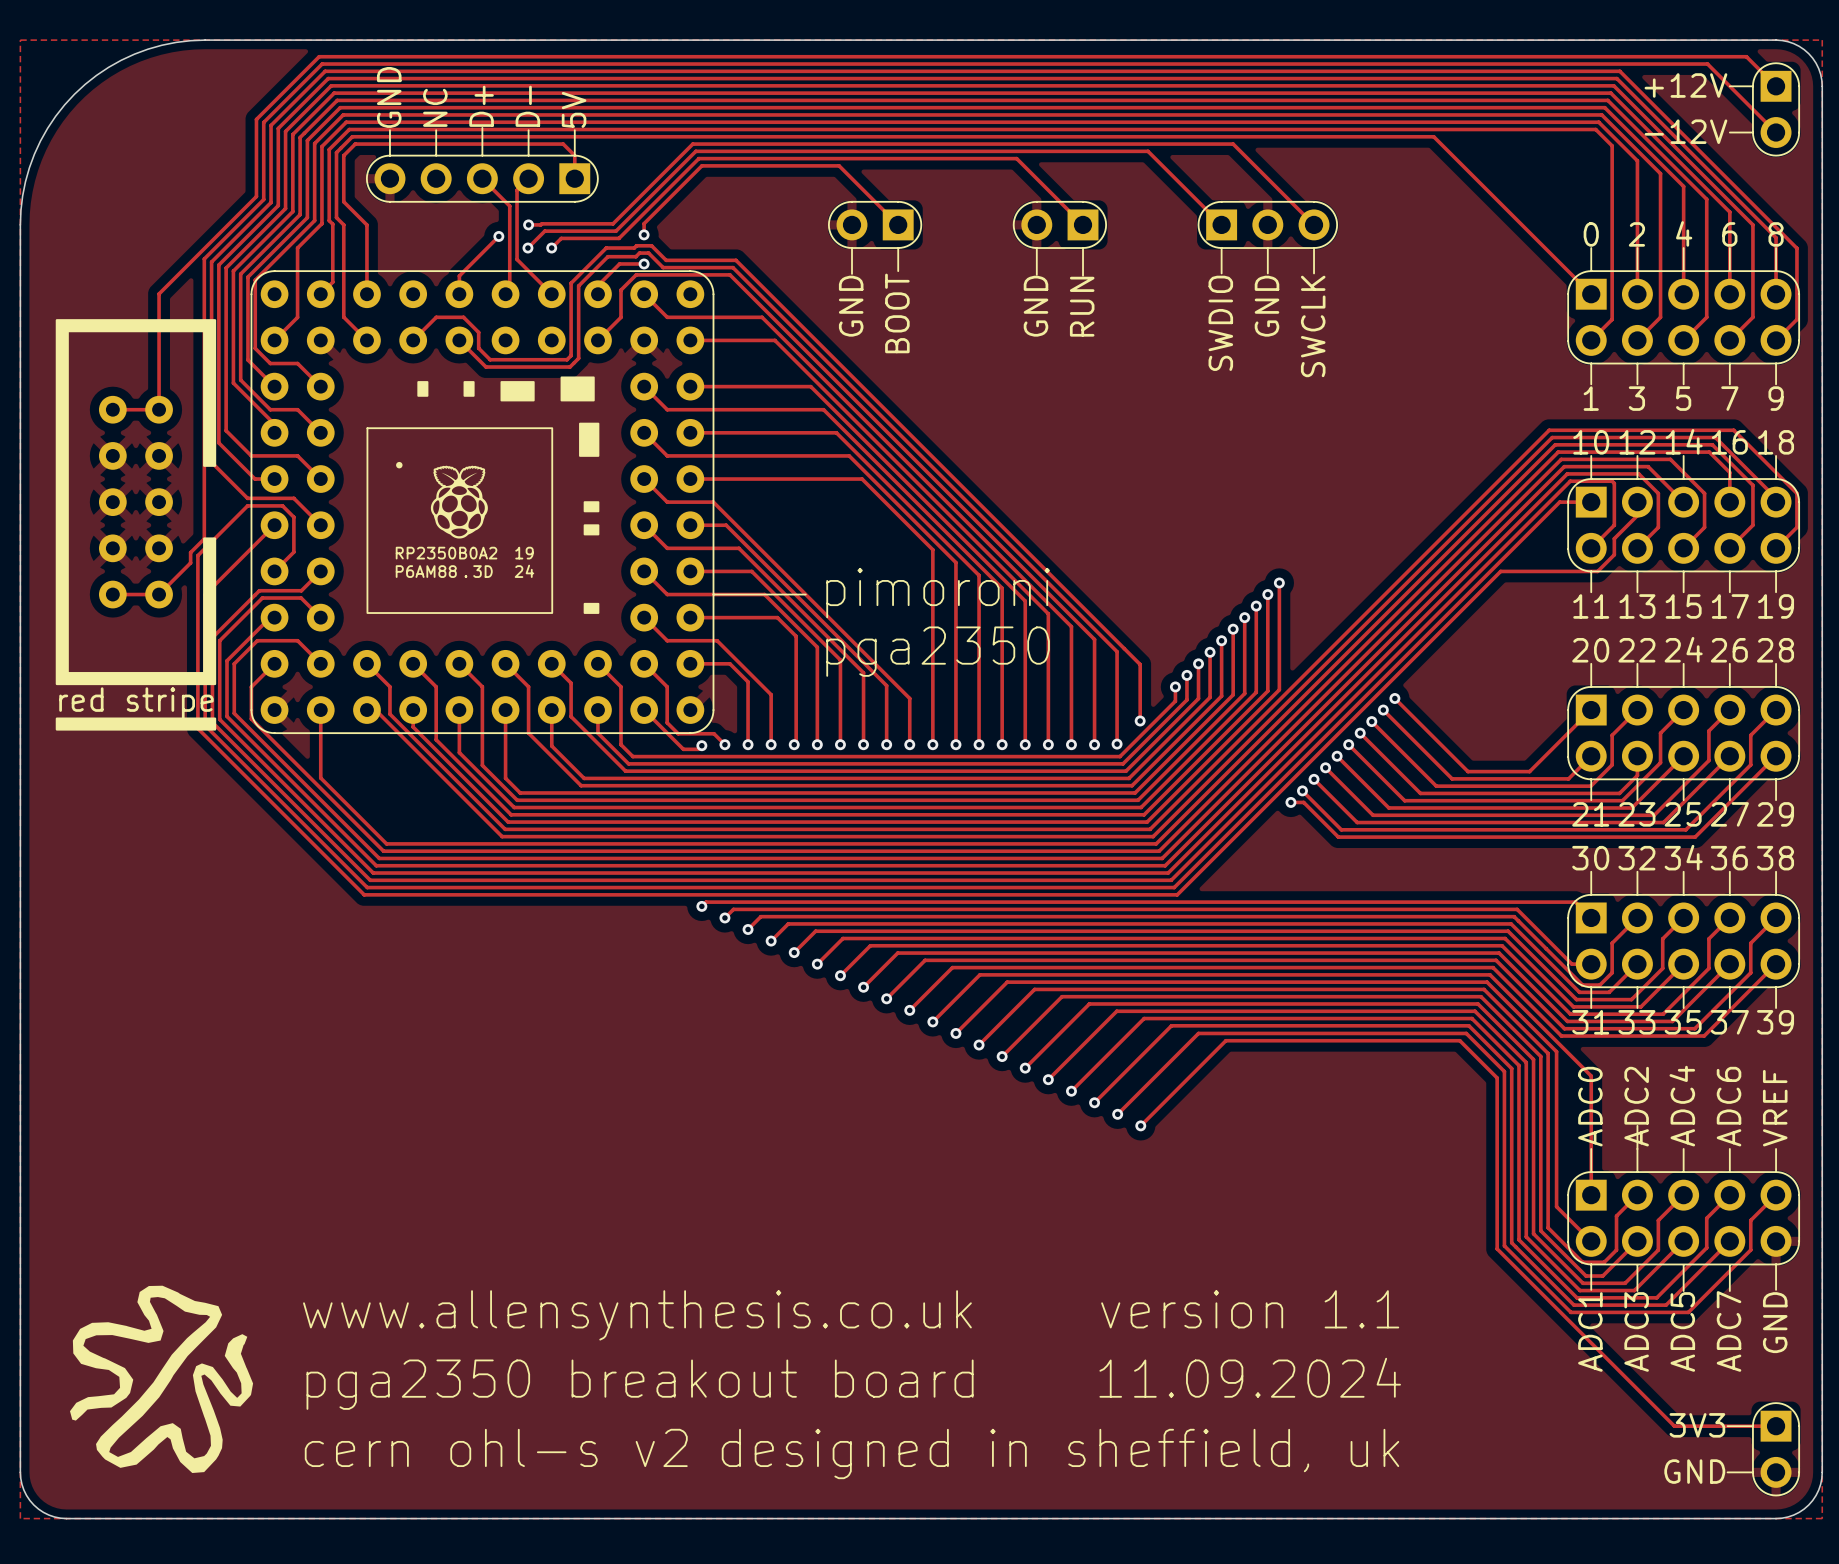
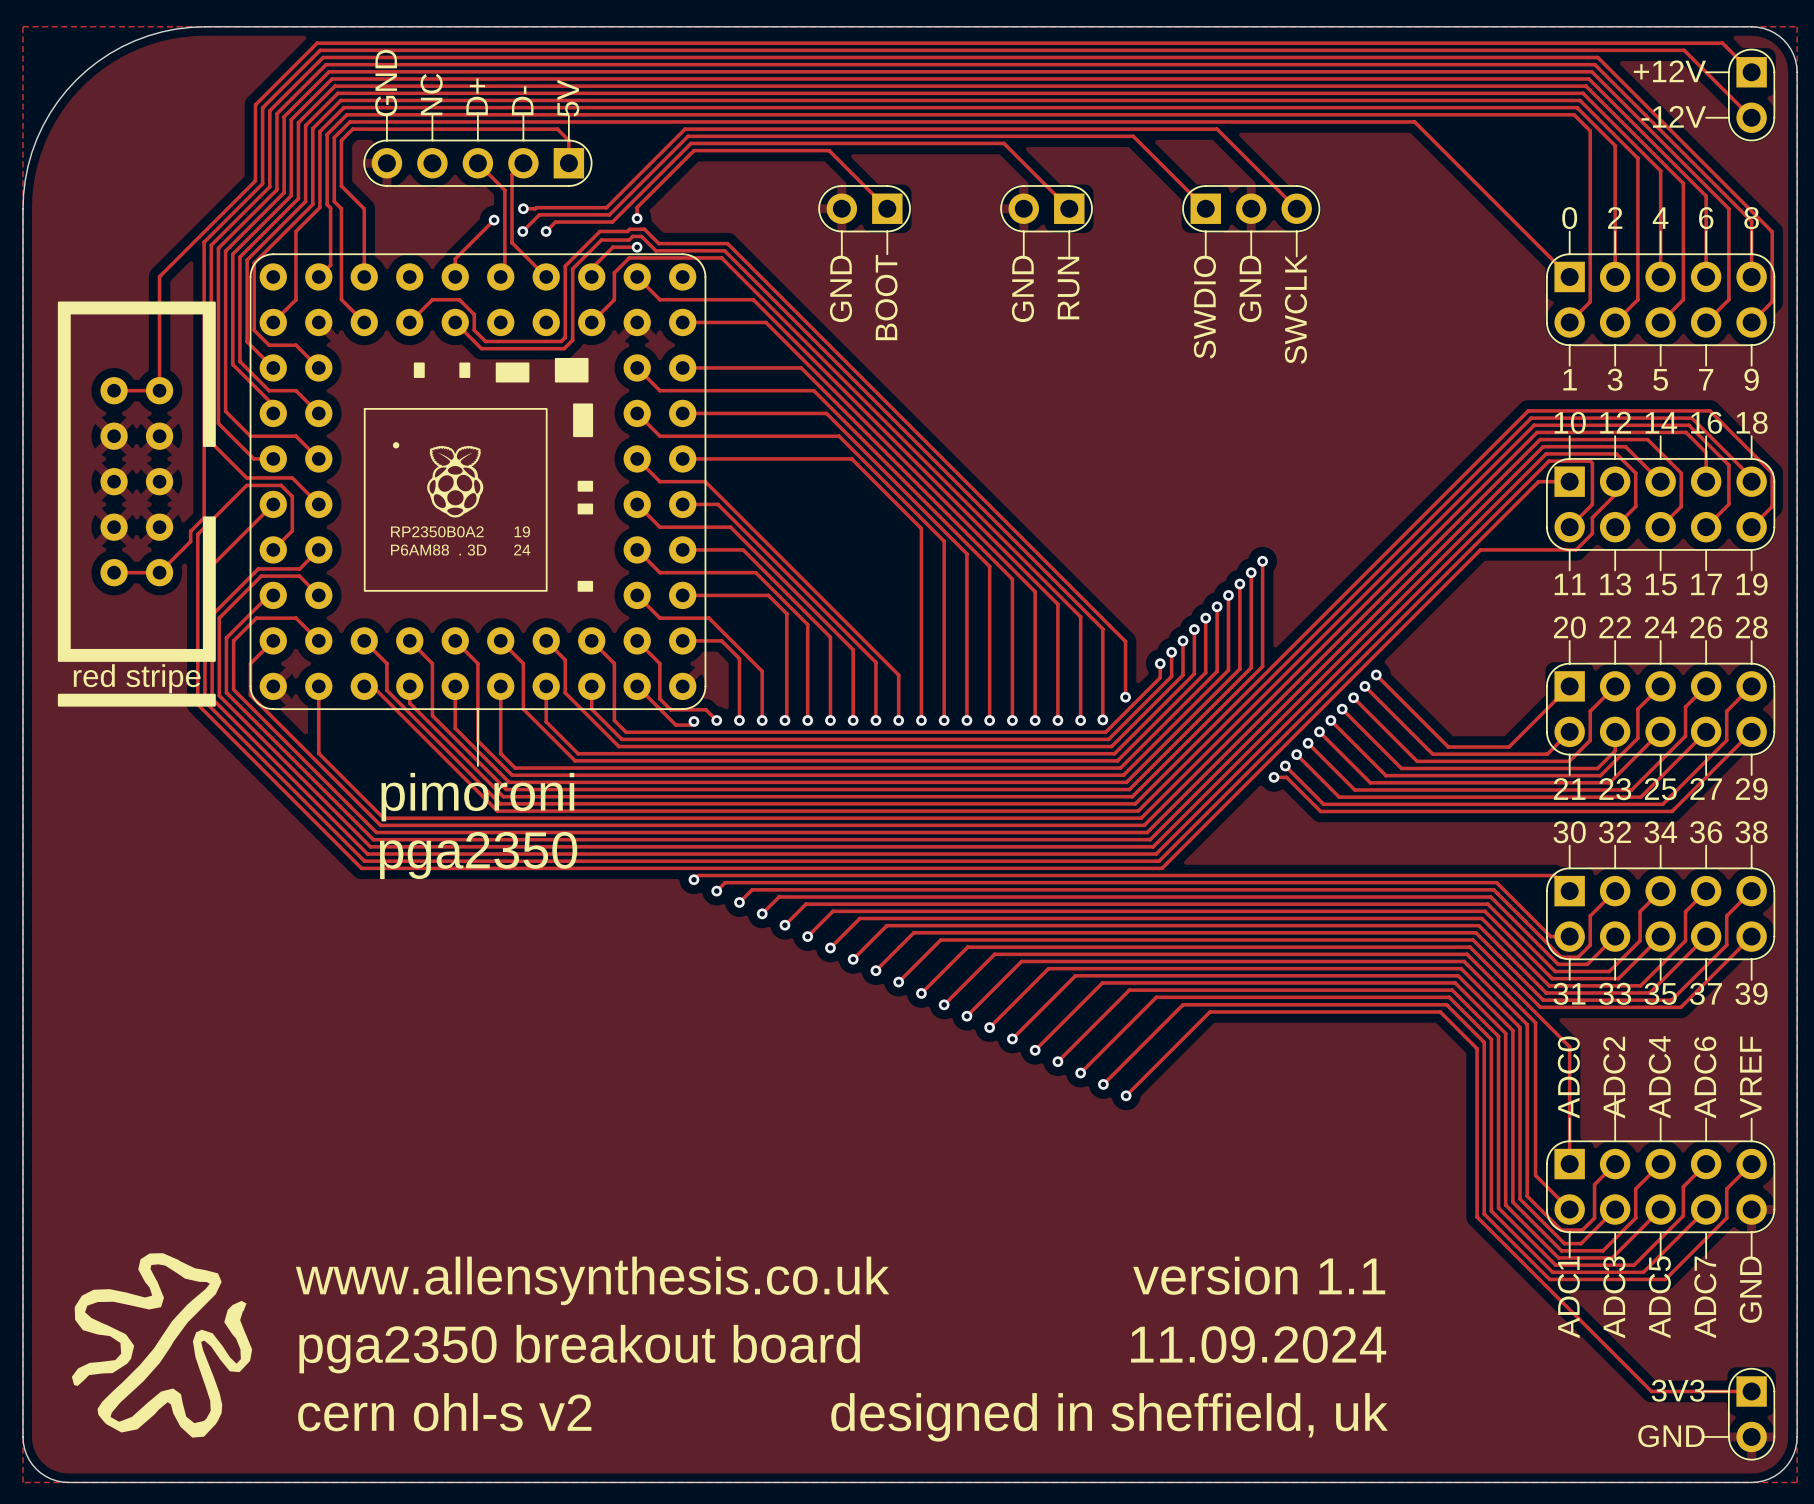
text position: pimoroni (938, 593) -> pimoroni (477, 797)
line: (713, 594) (805, 594) -> none
text position: pga2350 (938, 651) -> pga2350 (478, 855)
line: none -> (477, 709) (477, 765)

